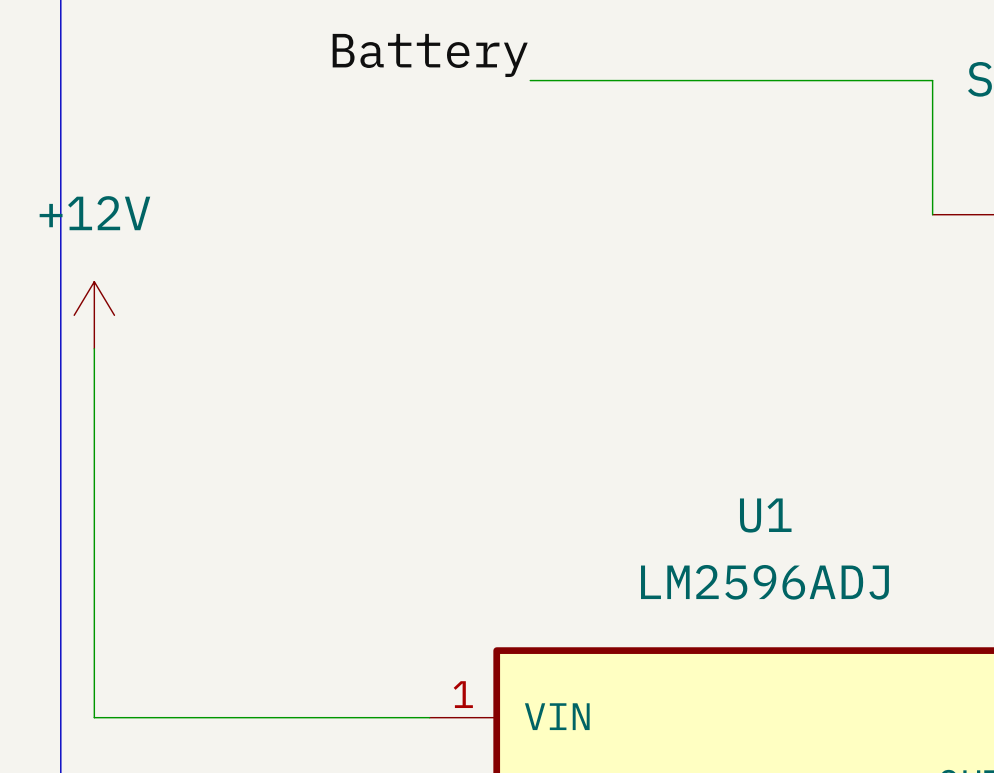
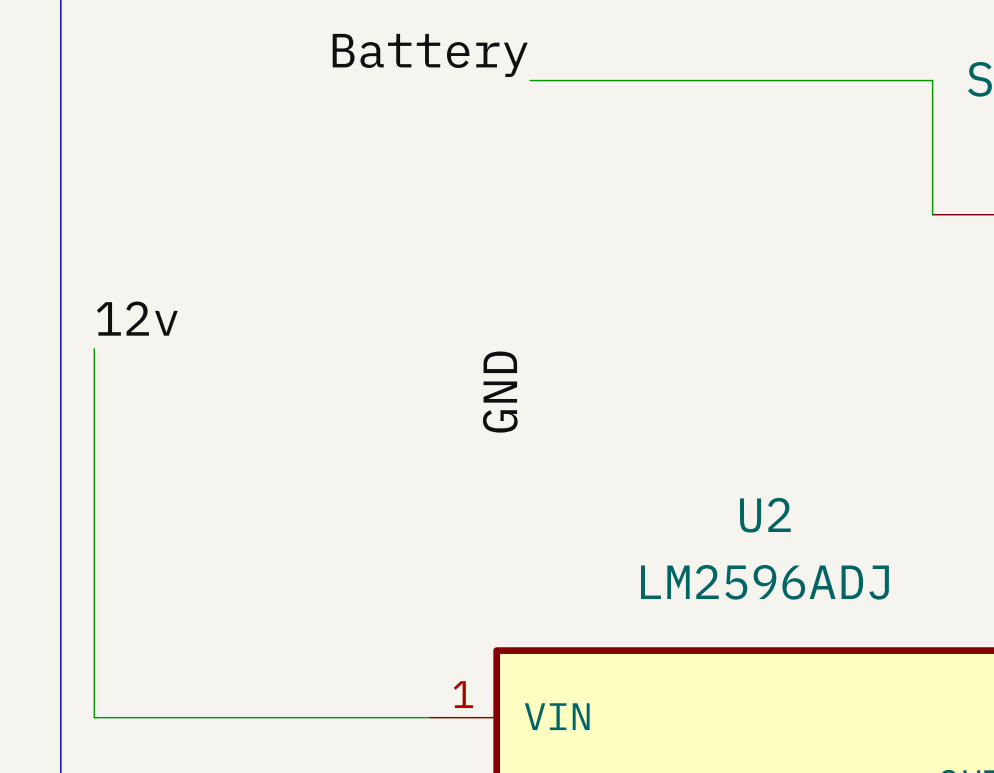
power symbol: +12V (94, 315) -> none
label: none -> 12v (137, 318)
label: none -> GND (500, 392)
U1 name: U1 (765, 515) -> U2 (765, 515)

